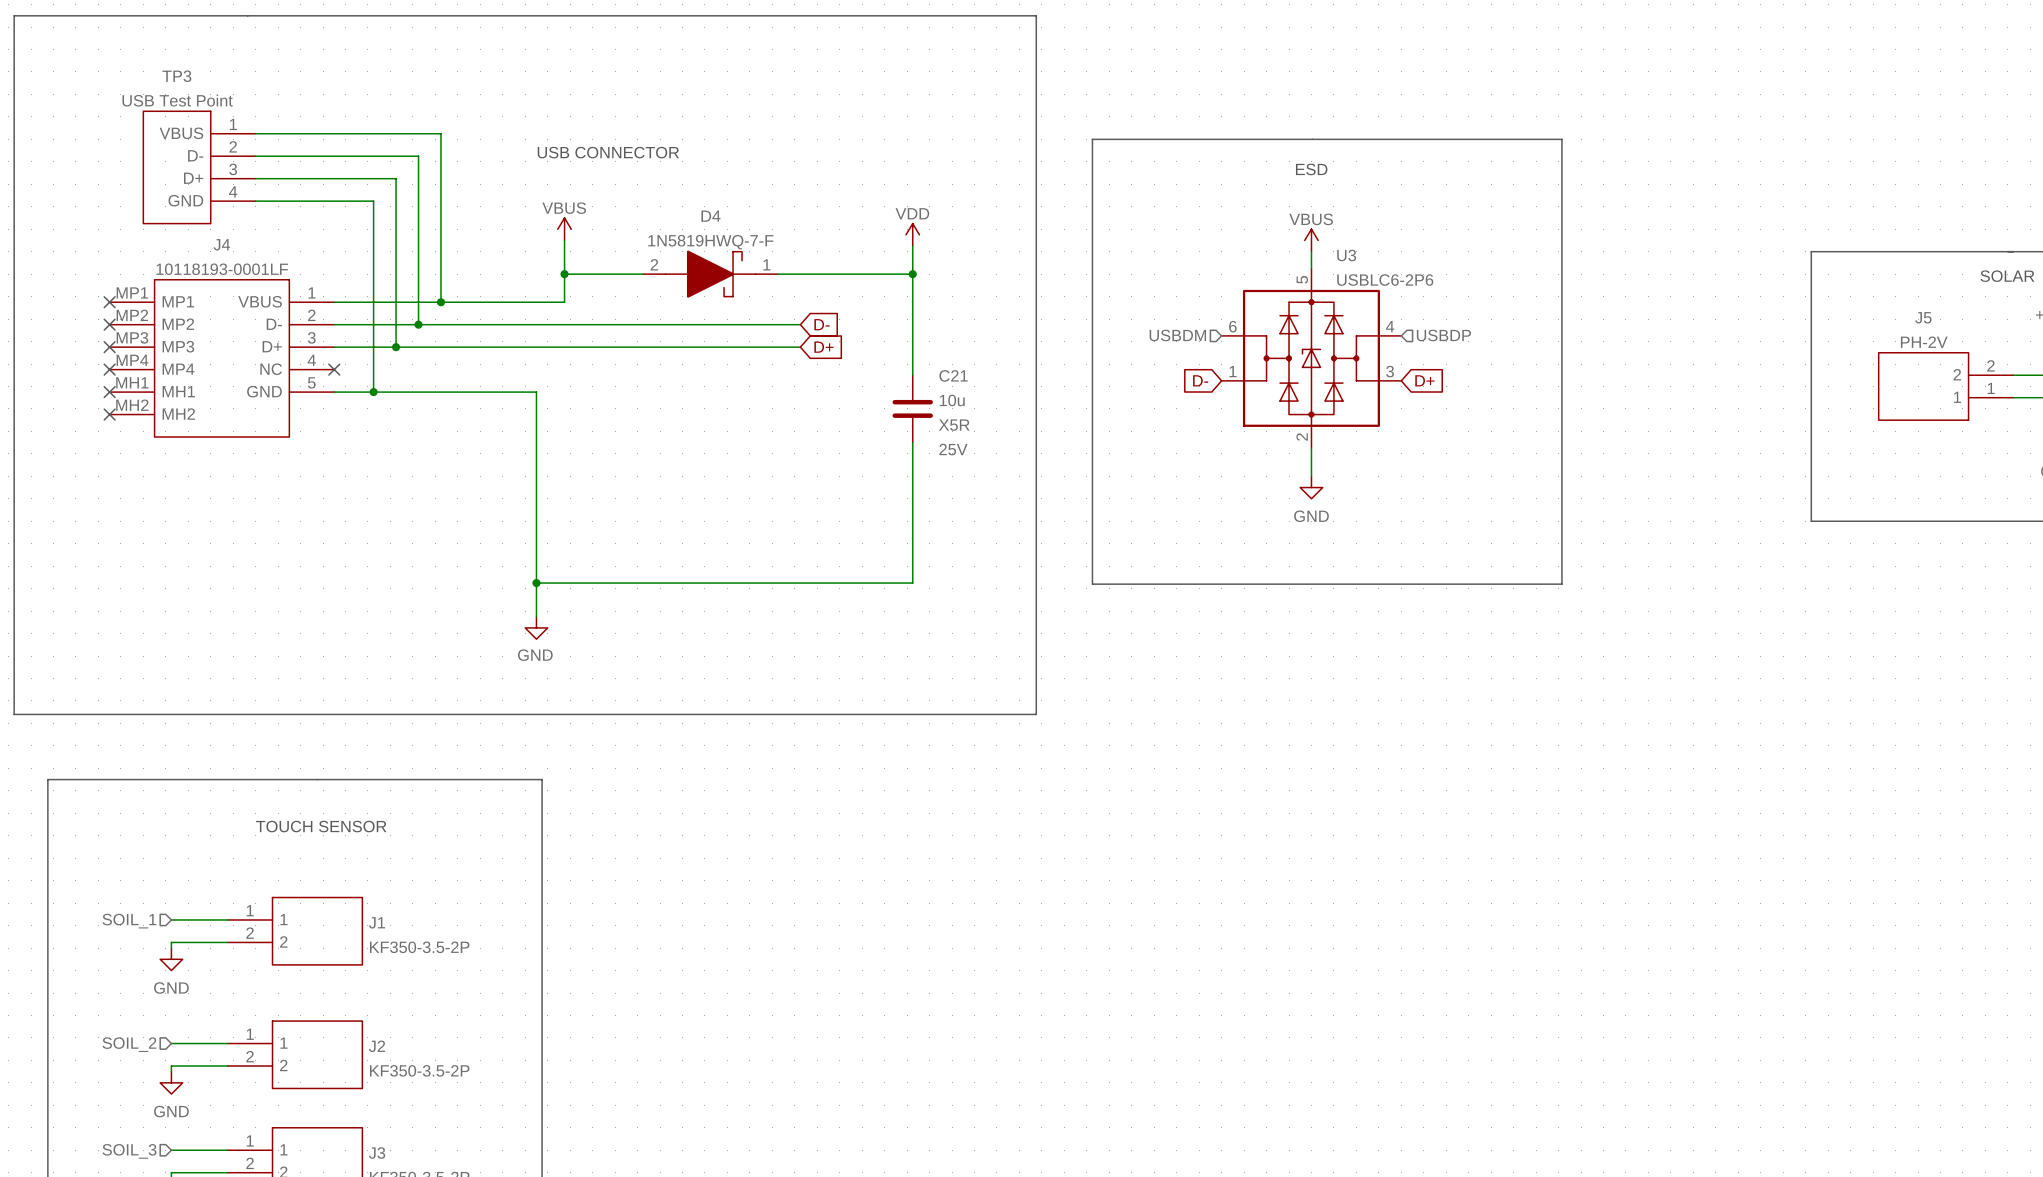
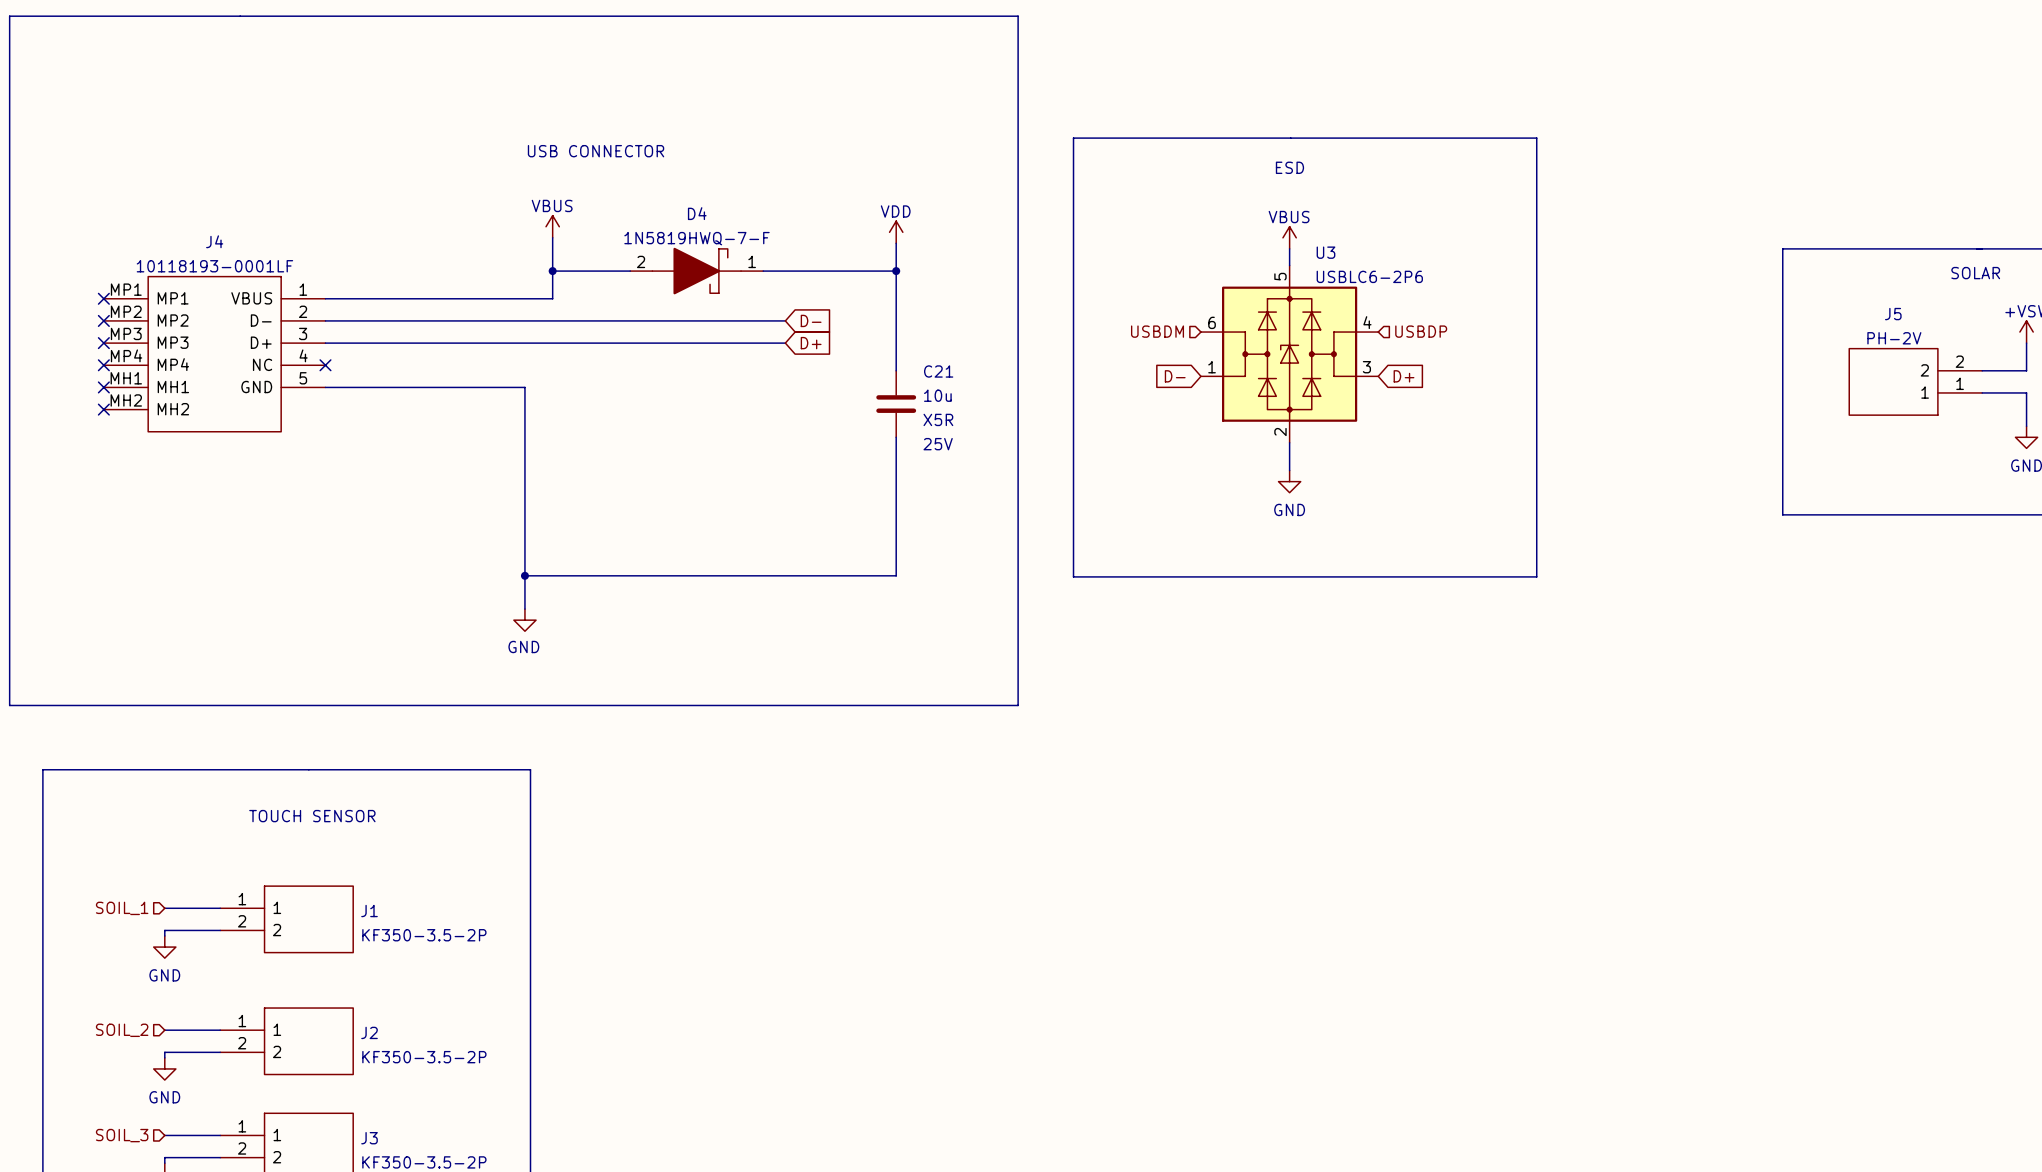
wire: (255, 133) (440, 133) (440, 302) -> none
wire: (255, 156) (418, 156) (418, 324) -> none
TP3: USB Test Point (199, 167) -> none
wire: (255, 178) (396, 178) (396, 347) -> none
wire: (255, 201) (373, 201) (373, 392) -> none
junction: (440, 302) -> none
junction: (418, 324) -> none
junction: (396, 347) -> none
junction: (373, 392) -> none

